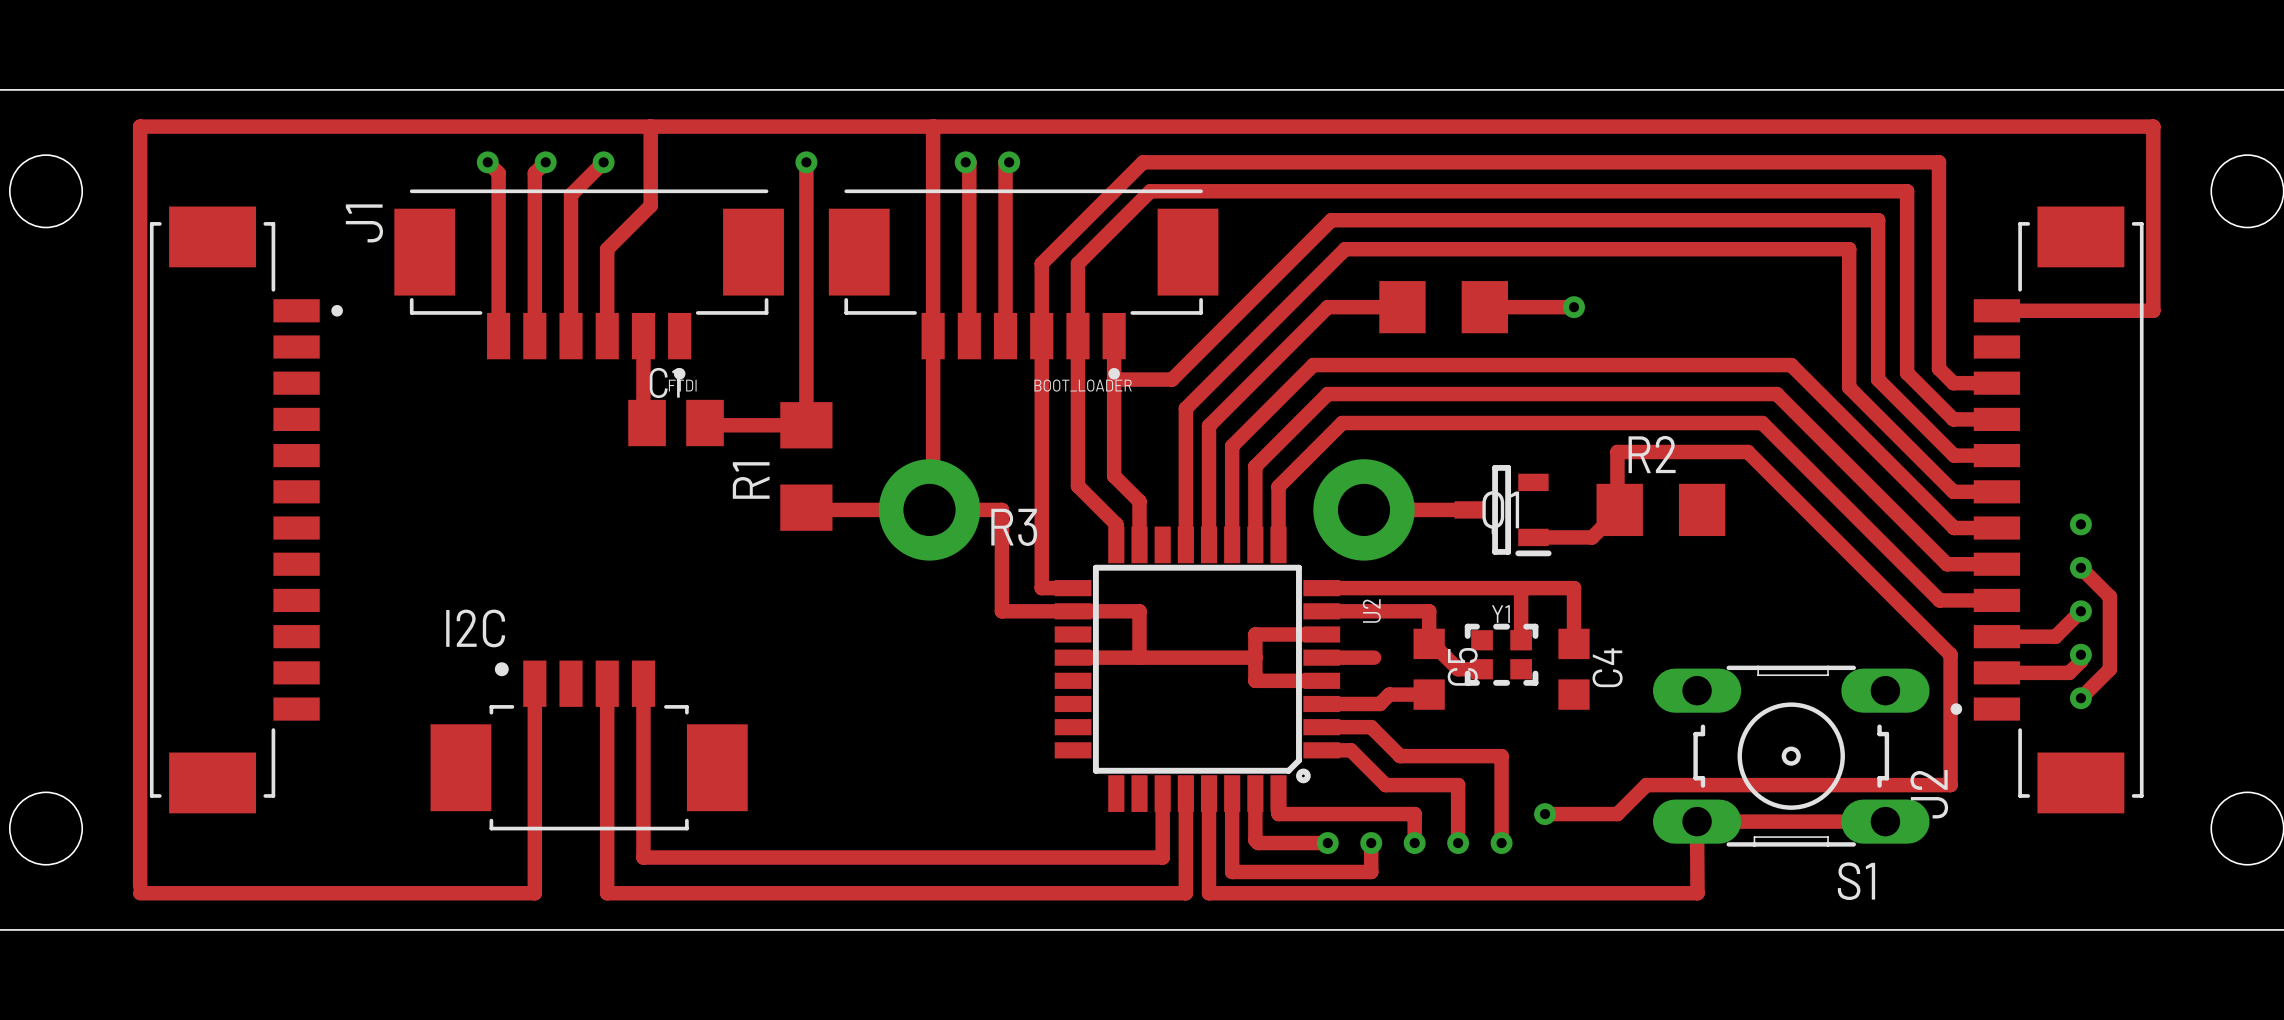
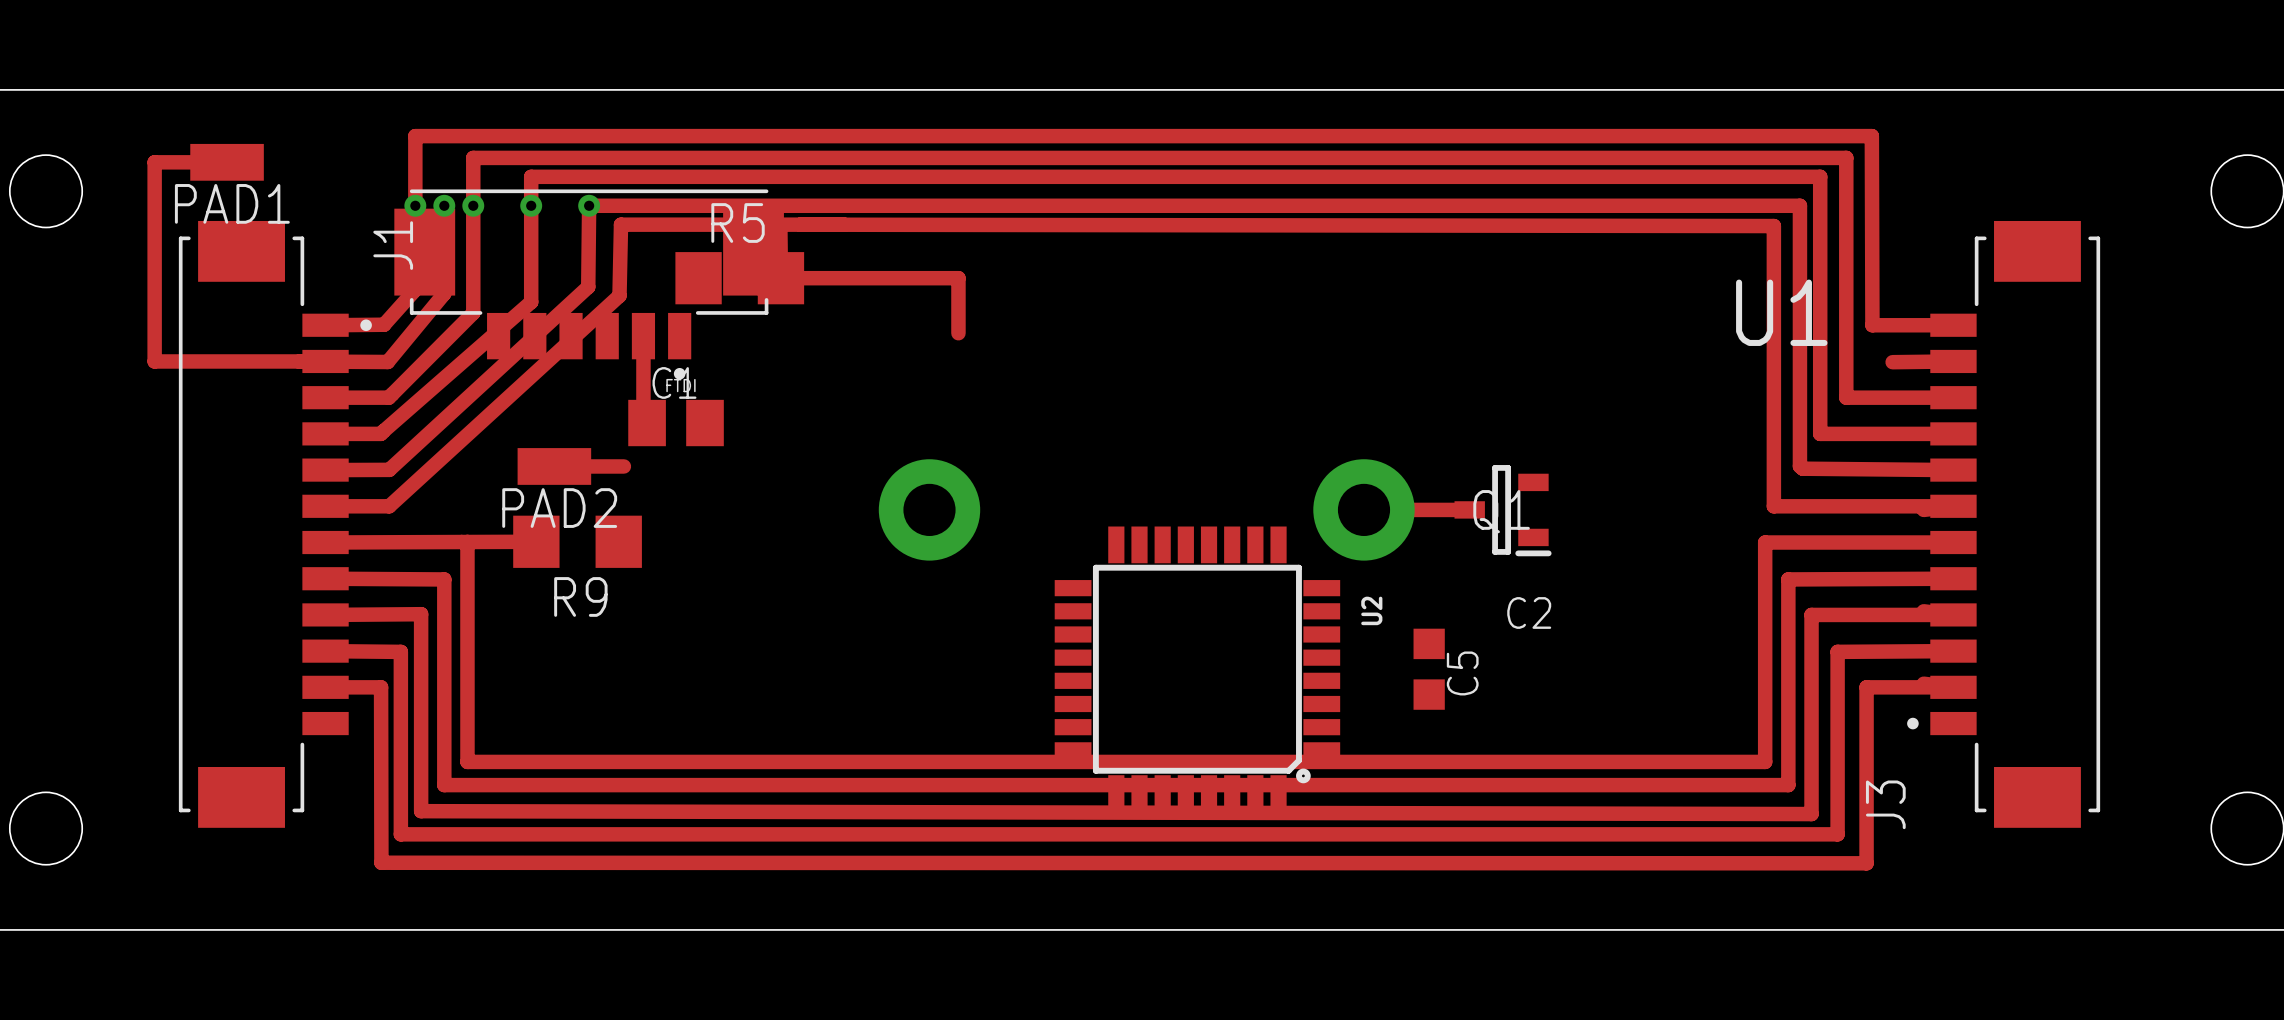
track: (650, 126) (650, 205) (607, 249) (607, 336) -> none
track: (933, 126) (933, 509) -> none
track: none -> (227, 162) (154, 162) (154, 361) (387, 362) (444, 293) (444, 205)
PAD1: none -> (227, 162)
track: (487, 162) (498, 173) (498, 336) -> none
via: (487, 162) -> none
track: (545, 162) (534, 173) (534, 336) -> none
via: (545, 162) -> none
track: (603, 162) (571, 194) (571, 336) -> none
via: (603, 162) -> none
track: (806, 162) (806, 425) (707, 425) (705, 423) -> none
via: (806, 162) -> none
track: (965, 162) (969, 162) (969, 336) -> none
via: (965, 162) -> none
track: (1009, 162) (1005, 162) (1005, 336) -> none
via: (1009, 162) -> none
via: none -> (415, 205)
via: none -> (444, 205)
via: none -> (473, 205)
via: none -> (531, 205)
via: none -> (589, 205)
track: none -> (780, 224) (780, 278) (958, 278) (958, 333)
track: none -> (800, 224) (1773, 226) (1773, 506) (1953, 506) (1923, 509)
track: none -> (844, 224) (621, 224) (619, 295) (389, 506) (325, 506)
R5: none -> (739, 278)
BOOT_LOADER: (1023, 284) -> none
track: (1402, 307) (1327, 307) (1209, 425) (1209, 544) -> none
R3: (1443, 307) -> none
track: (1484, 307) (1574, 307) -> none
via: (1574, 307) -> none
track: (1996, 310) (2153, 310) (2153, 126) (140, 126) (140, 886) -> none
U1: none -> (1781, 312)
track: none -> (325, 325) (384, 324) (415, 289) (415, 136) (1871, 136) (1872, 325) (1953, 325)
track: (1114, 336) (1114, 476) (1139, 501) (1139, 544) -> none
track: none -> (1953, 361) (1892, 362)
track: (1114, 379) (1172, 379) (1331, 220) (1878, 220) (1878, 379) (1954, 455) (1996, 455) -> none
track: (1996, 383) (1953, 383) (1938, 368) (1938, 162) (1143, 162) (1041, 263) (1041, 588) (1073, 588) -> none
track: none -> (325, 397) (388, 397) (473, 312) (473, 157) (1846, 157) (1846, 397) (1953, 397)
track: (1996, 419) (1953, 419) (1907, 373) (1907, 191) (1150, 191) (1077, 263) (1077, 486) (1116, 524) (1116, 544) -> none
track: none -> (325, 433) (380, 433) (531, 302) (531, 176) (1820, 176) (1820, 433) (1953, 433)
track: none -> (554, 466) (623, 466)
PAD2: none -> (554, 466)
R1: (806, 466) -> none
track: none -> (325, 470) (389, 469) (588, 287) (589, 205) (1799, 205) (1799, 466) (1802, 468) (1953, 470)
track: (1996, 491) (1953, 491) (1849, 387) (1849, 249) (1345, 249) (1185, 408) (1185, 544) -> none
track: (806, 507) (808, 509) (1001, 509) (1001, 611) (1139, 611) (1139, 657) -> none
J1 position: (246, 509) -> (275, 524)
R2: (1660, 509) -> none
J2: (2047, 509) -> none
J3: none -> (2003, 524)
via: (2080, 524) -> none
track: (1996, 528) (1954, 528) (1791, 365) (1313, 365) (1232, 446) (1232, 544) -> none
track: (1533, 537) (1592, 537) (1619, 509) (1617, 507) (1617, 451) (1747, 451) (1950, 654) (1950, 785) (1788, 785) -> (1953, 578) (1788, 579) (1788, 785)
track: none -> (467, 541) (467, 761) (1765, 761) (1765, 542) (1953, 542)
track: none -> (536, 541) (325, 542)
R9: none -> (577, 541)
track: (1255, 544) (1255, 466) (1327, 394) (1776, 394) (1946, 564) (1996, 564) (1993, 567) -> none
track: (1278, 544) (1278, 486) (1342, 423) (1762, 423) (1939, 600) (1996, 600) -> none
track: (2080, 567) (2109, 596) (2109, 669) (2080, 698) -> none
via: (2080, 567) -> none
track: (1321, 588) (1574, 588) (1574, 643) -> none
track: (1521, 588) (1521, 640) -> none
track: (1321, 611) (1429, 611) (1429, 643) (1432, 643) (1458, 669) (1482, 669) -> none
track: none -> (1923, 611) (1953, 614) (1811, 614) (1811, 814) (421, 811) (421, 614) (325, 614)
track: (2080, 611) (2055, 636) (1996, 636) -> none
via: (2080, 611) -> none
C2: none -> (1529, 612)
track: (1321, 634) (1255, 634) (1255, 680) (1321, 680) -> none
track: none -> (325, 651) (400, 651) (400, 834) (1837, 834) (1837, 651) (1953, 651)
Y1: (1501, 654) -> none
track: (2080, 654) (2080, 661) (2069, 672) (1996, 672) -> none
via: (2080, 654) -> none
track: (1073, 657) (1255, 657) -> none
track: (1321, 657) (1374, 657) -> none
C4: (1574, 669) -> none
track: (534, 683) (534, 893) (140, 893) -> none
track: (607, 683) (607, 893) (1185, 893) (1185, 793) -> none
track: (643, 683) (643, 857) (1162, 857) (1162, 793) -> none
track: none -> (1923, 683) (1953, 687) (1866, 687) (1866, 863) (381, 862) (381, 687) (325, 687)
track: (1429, 694) (1389, 694) (1379, 704) (1321, 704) -> none
via: (2080, 698) -> none
track: (1321, 727) (1371, 727) (1400, 756) (1501, 756) (1501, 843) -> none
I2C: (589, 745) -> none
track: (1321, 750) (1350, 750) (1385, 785) -> (325, 578) (444, 579) (444, 785) (1385, 785)
S1: (1791, 756) -> none
track: (1458, 785) (1458, 843) -> none
track: (1646, 785) (1617, 814) (1545, 814) -> (1646, 785) (1458, 785)
track: (1209, 793) (1209, 893) (1697, 893) (1697, 821) (1885, 821) -> none
track: (1232, 793) (1232, 872) (1371, 872) (1371, 843) -> none
track: (1255, 793) (1255, 840) (1258, 843) (1327, 843) -> none
track: (1278, 793) (1278, 814) (1414, 814) (1414, 843) -> none
via: (1545, 814) -> none
via: (1327, 843) -> none
via: (1371, 843) -> none
via: (1414, 843) -> none
via: (1458, 843) -> none
via: (1501, 843) -> none

